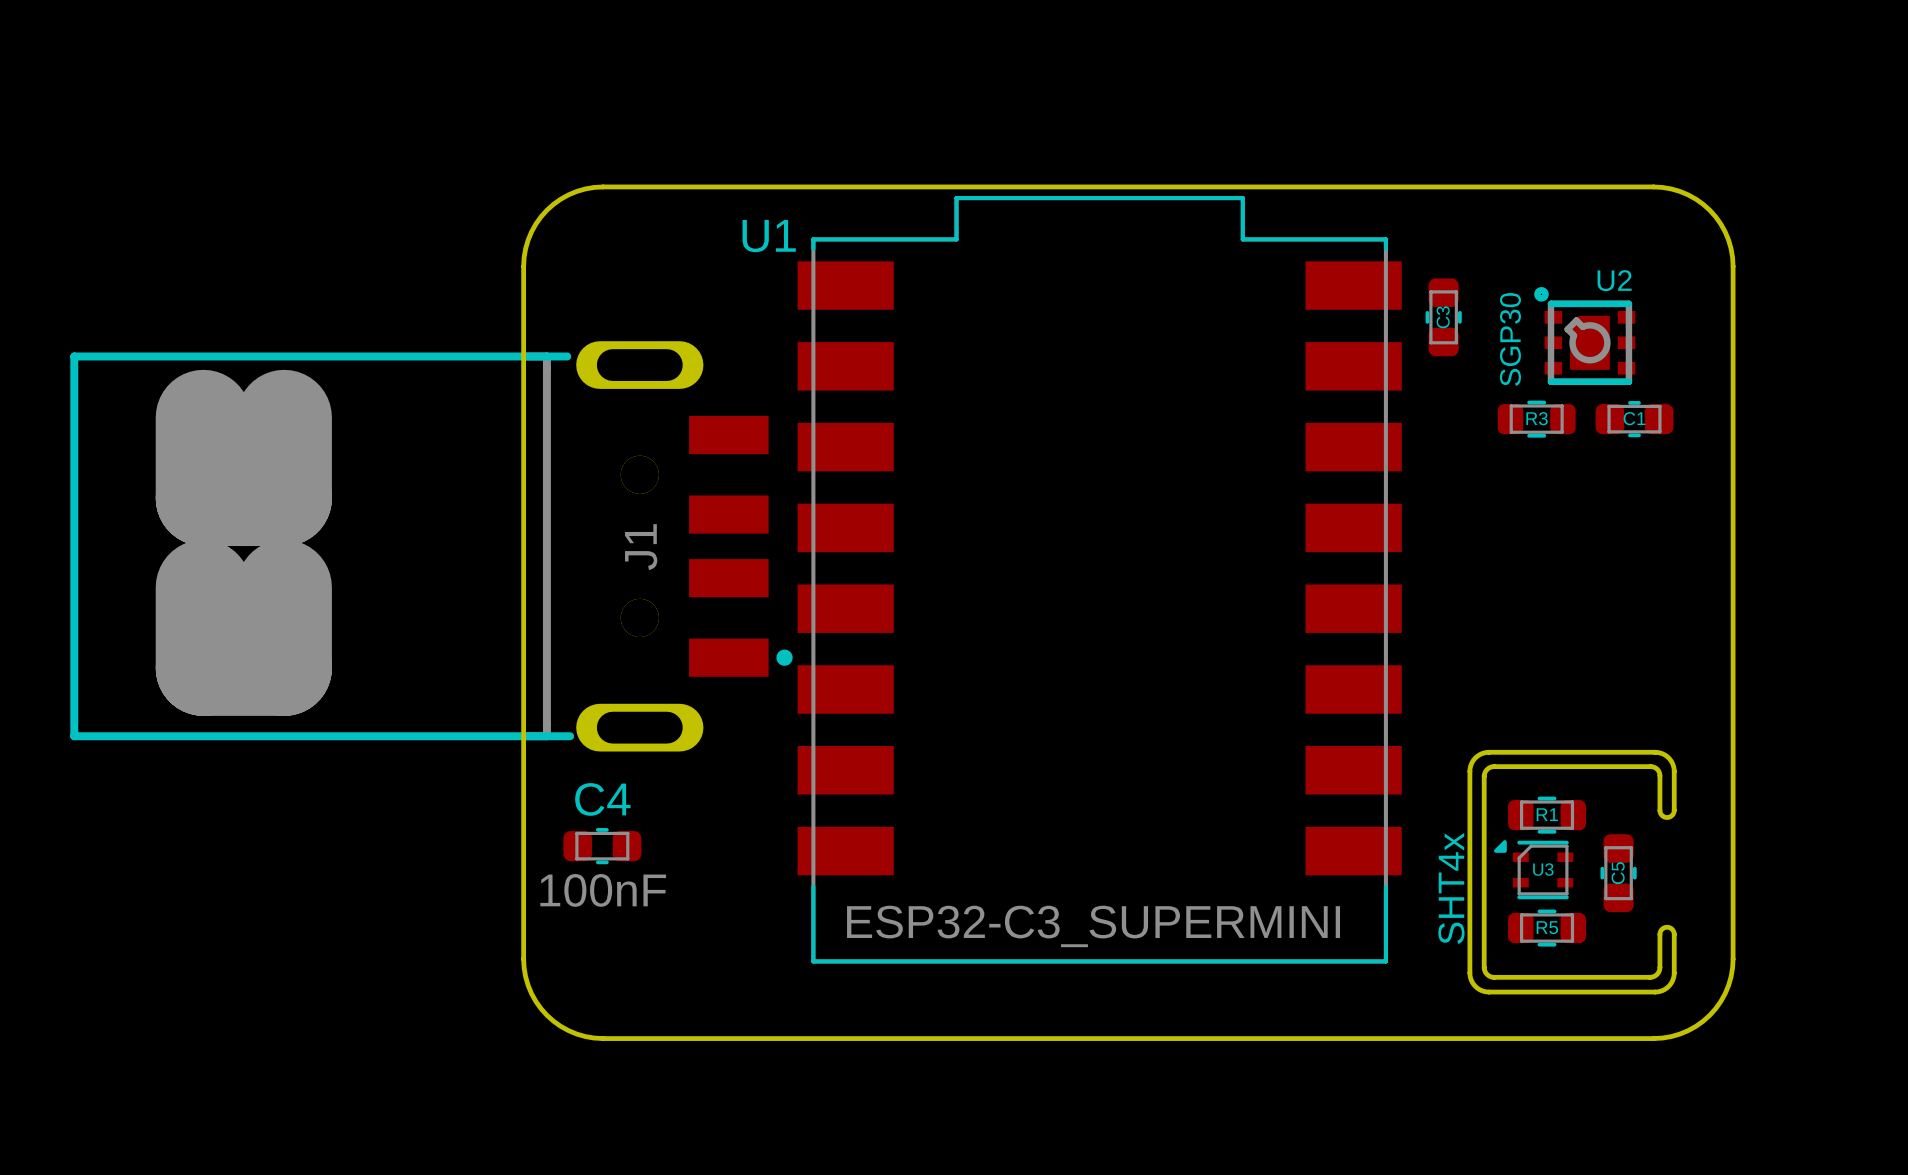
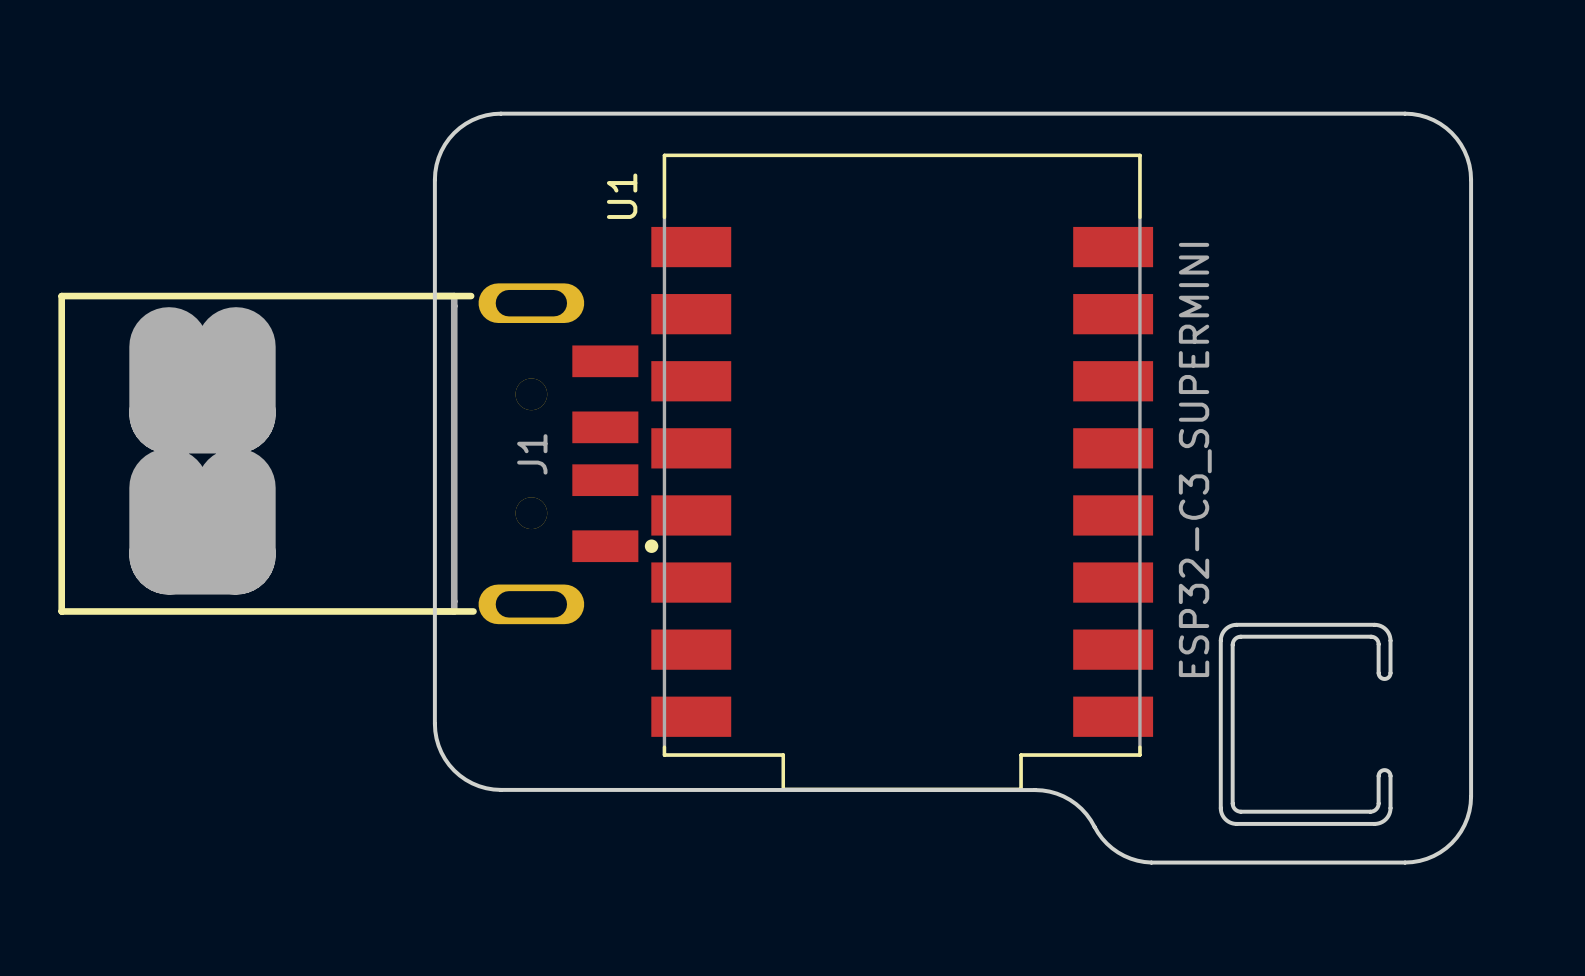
board edge: (523, 266) (528, 240) (540, 216) (560, 199) (576, 191) (594, 187) (1653, 186) (1679, 191) (1695, 199) (1715, 216) (1725, 231) (1731, 248) (1733, 266) (1732, 967) (1725, 993) (1709, 1015) (1688, 1030) (1662, 1038) (594, 1038) (576, 1034) (560, 1026) (546, 1015) (531, 993) (524, 967) (523, 871) -> (434, 221) (435, 172) (441, 151) (449, 138) (465, 123) (479, 117) (493, 114) (1405, 113) (1426, 117) (1440, 123) (1456, 138) (1464, 151) (1469, 164) (1471, 179) (1470, 803) (1464, 825) (1456, 837) (1440, 852) (1419, 860) (1405, 862) (1151, 862) (1137, 860) (1118, 852) (1102, 838) (1086, 814) (1076, 804) (1056, 793) (1042, 790) (500, 789) (486, 788) (465, 779) (449, 765) (438, 745) (434, 723)
C3: (1443, 317) -> none
U2: SGP30 (1584, 336) -> none
R3: (1536, 419) -> none
C1: (1634, 419) -> none
U1 rotation: 0° (1099, 579) -> 180° (902, 472)
R1: (1547, 815) -> none
C4: 100nF (602, 846) -> none
U3: SHT4x (1533, 869) -> none
C5: (1618, 873) -> none
U1 value position: ESP32-C3_SUPERMINI (1093, 926) -> ESP32-C3_SUPERMINI (1195, 459)
R5: (1547, 928) -> none

